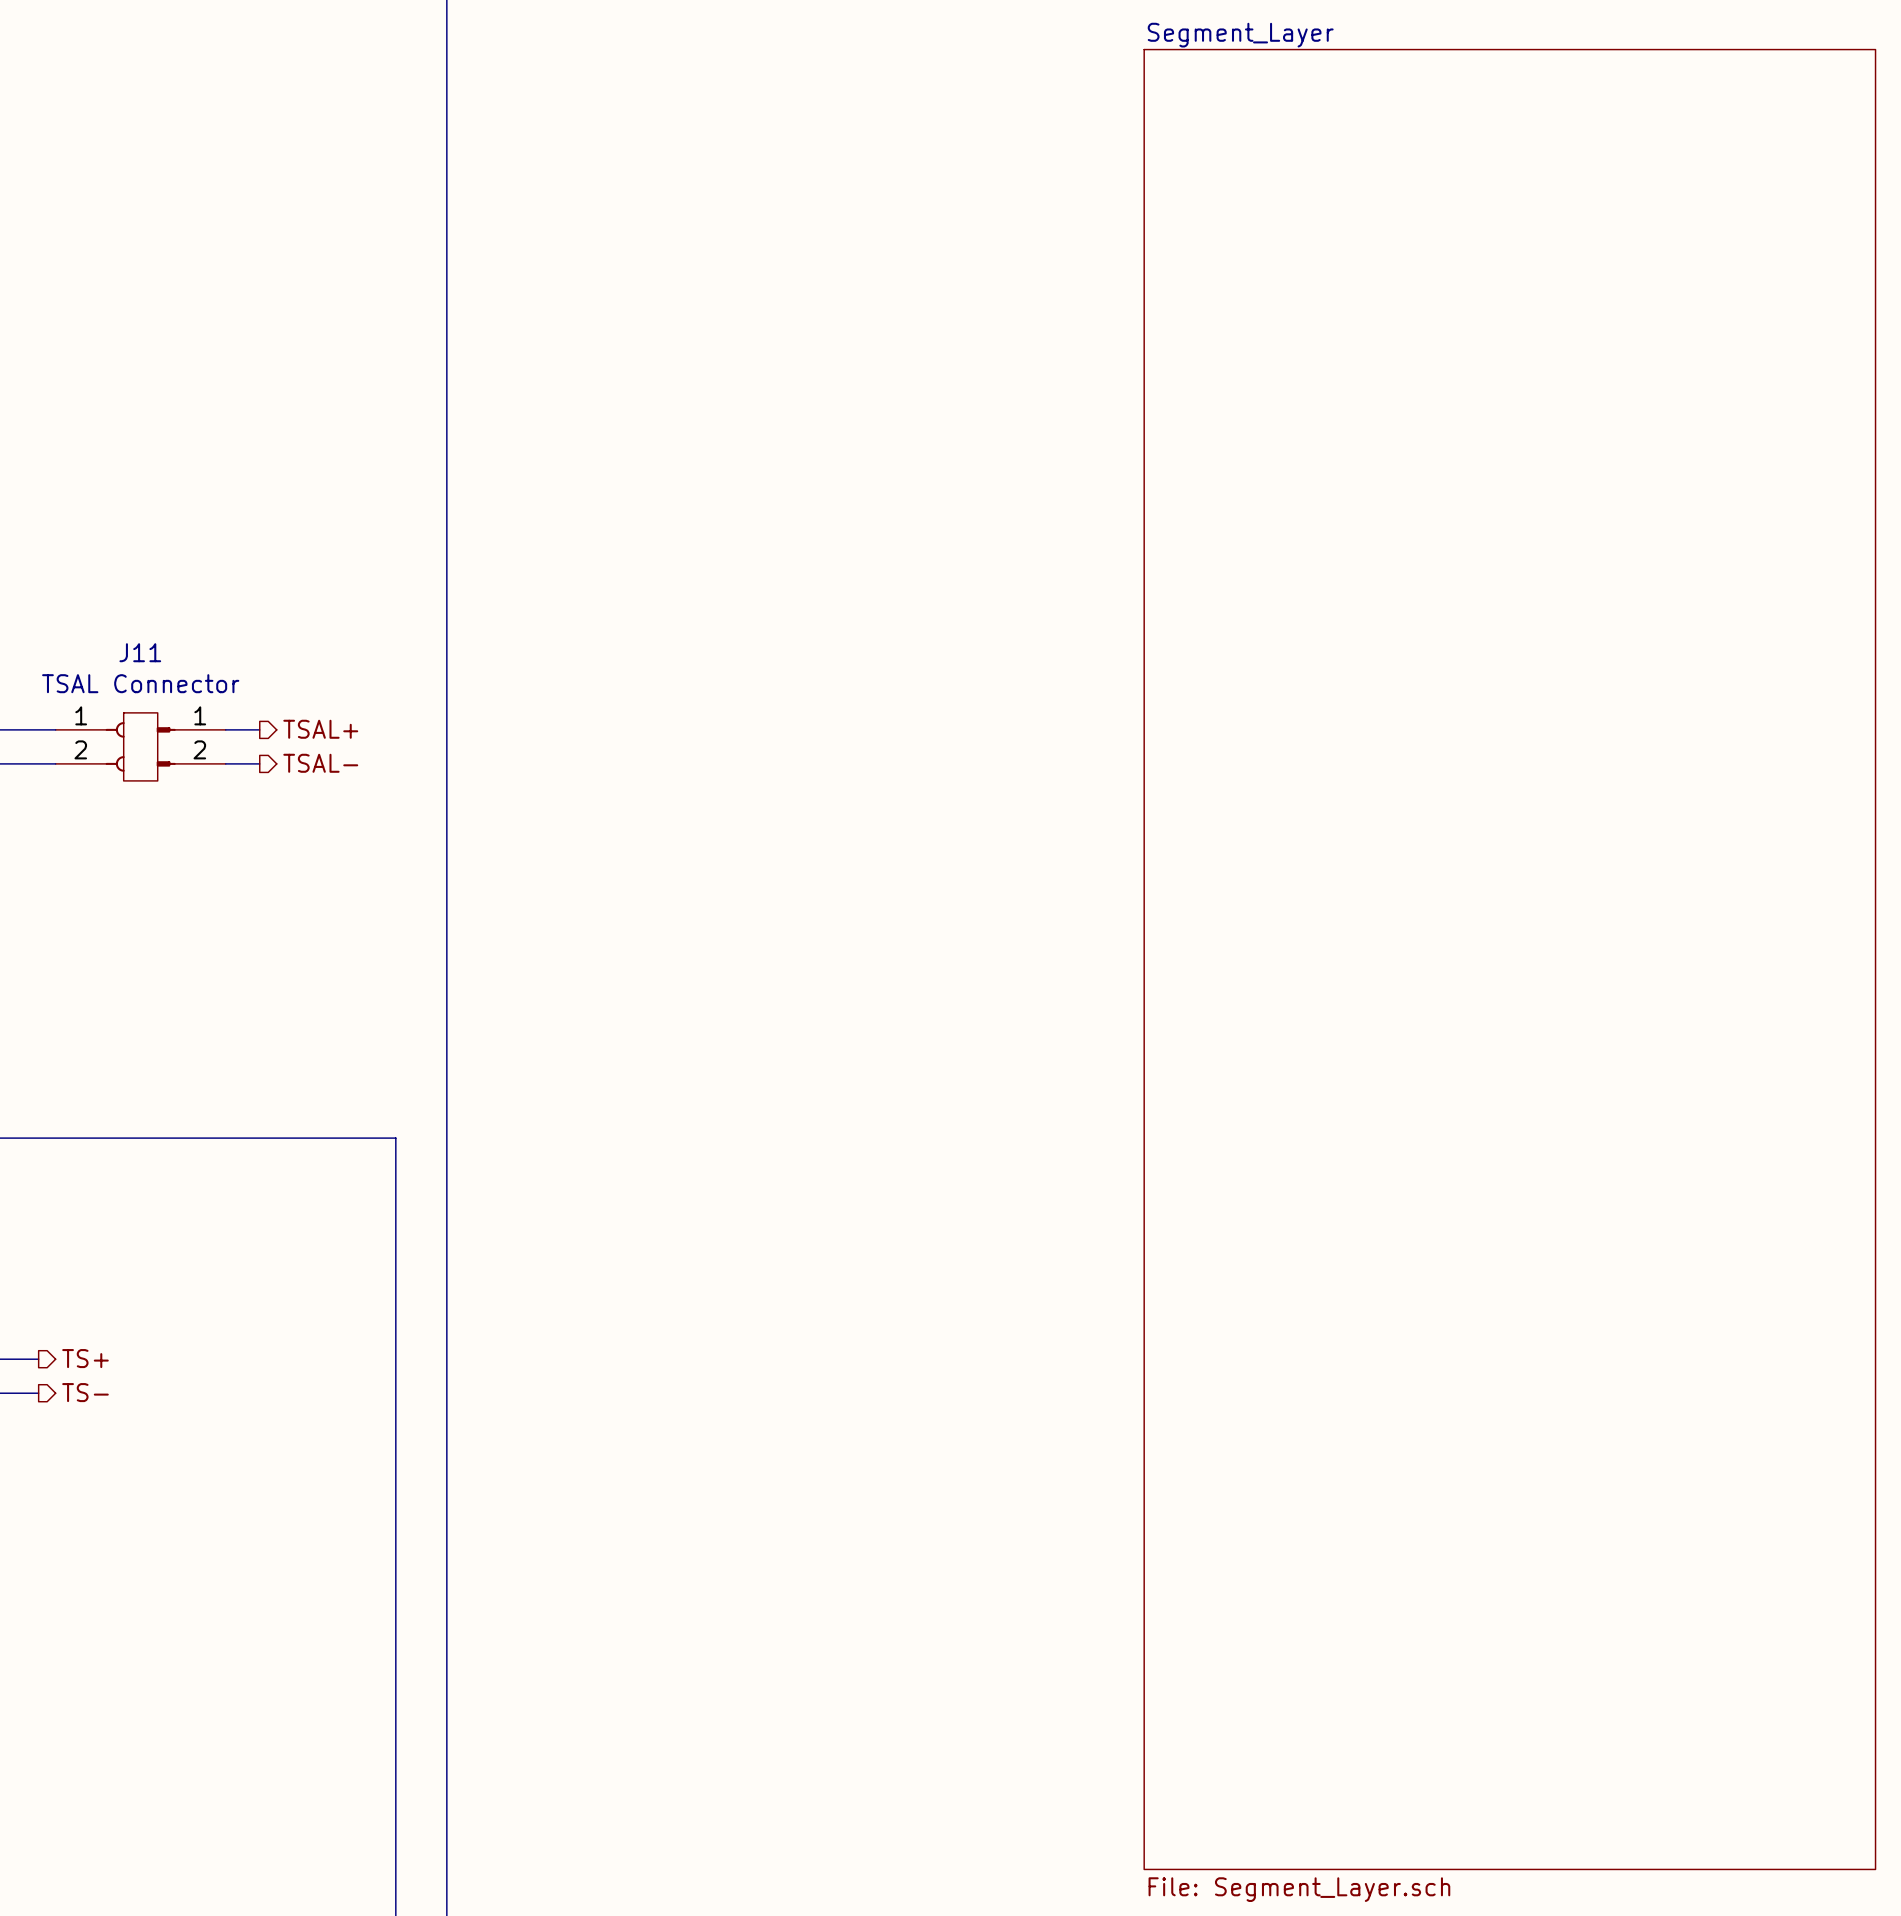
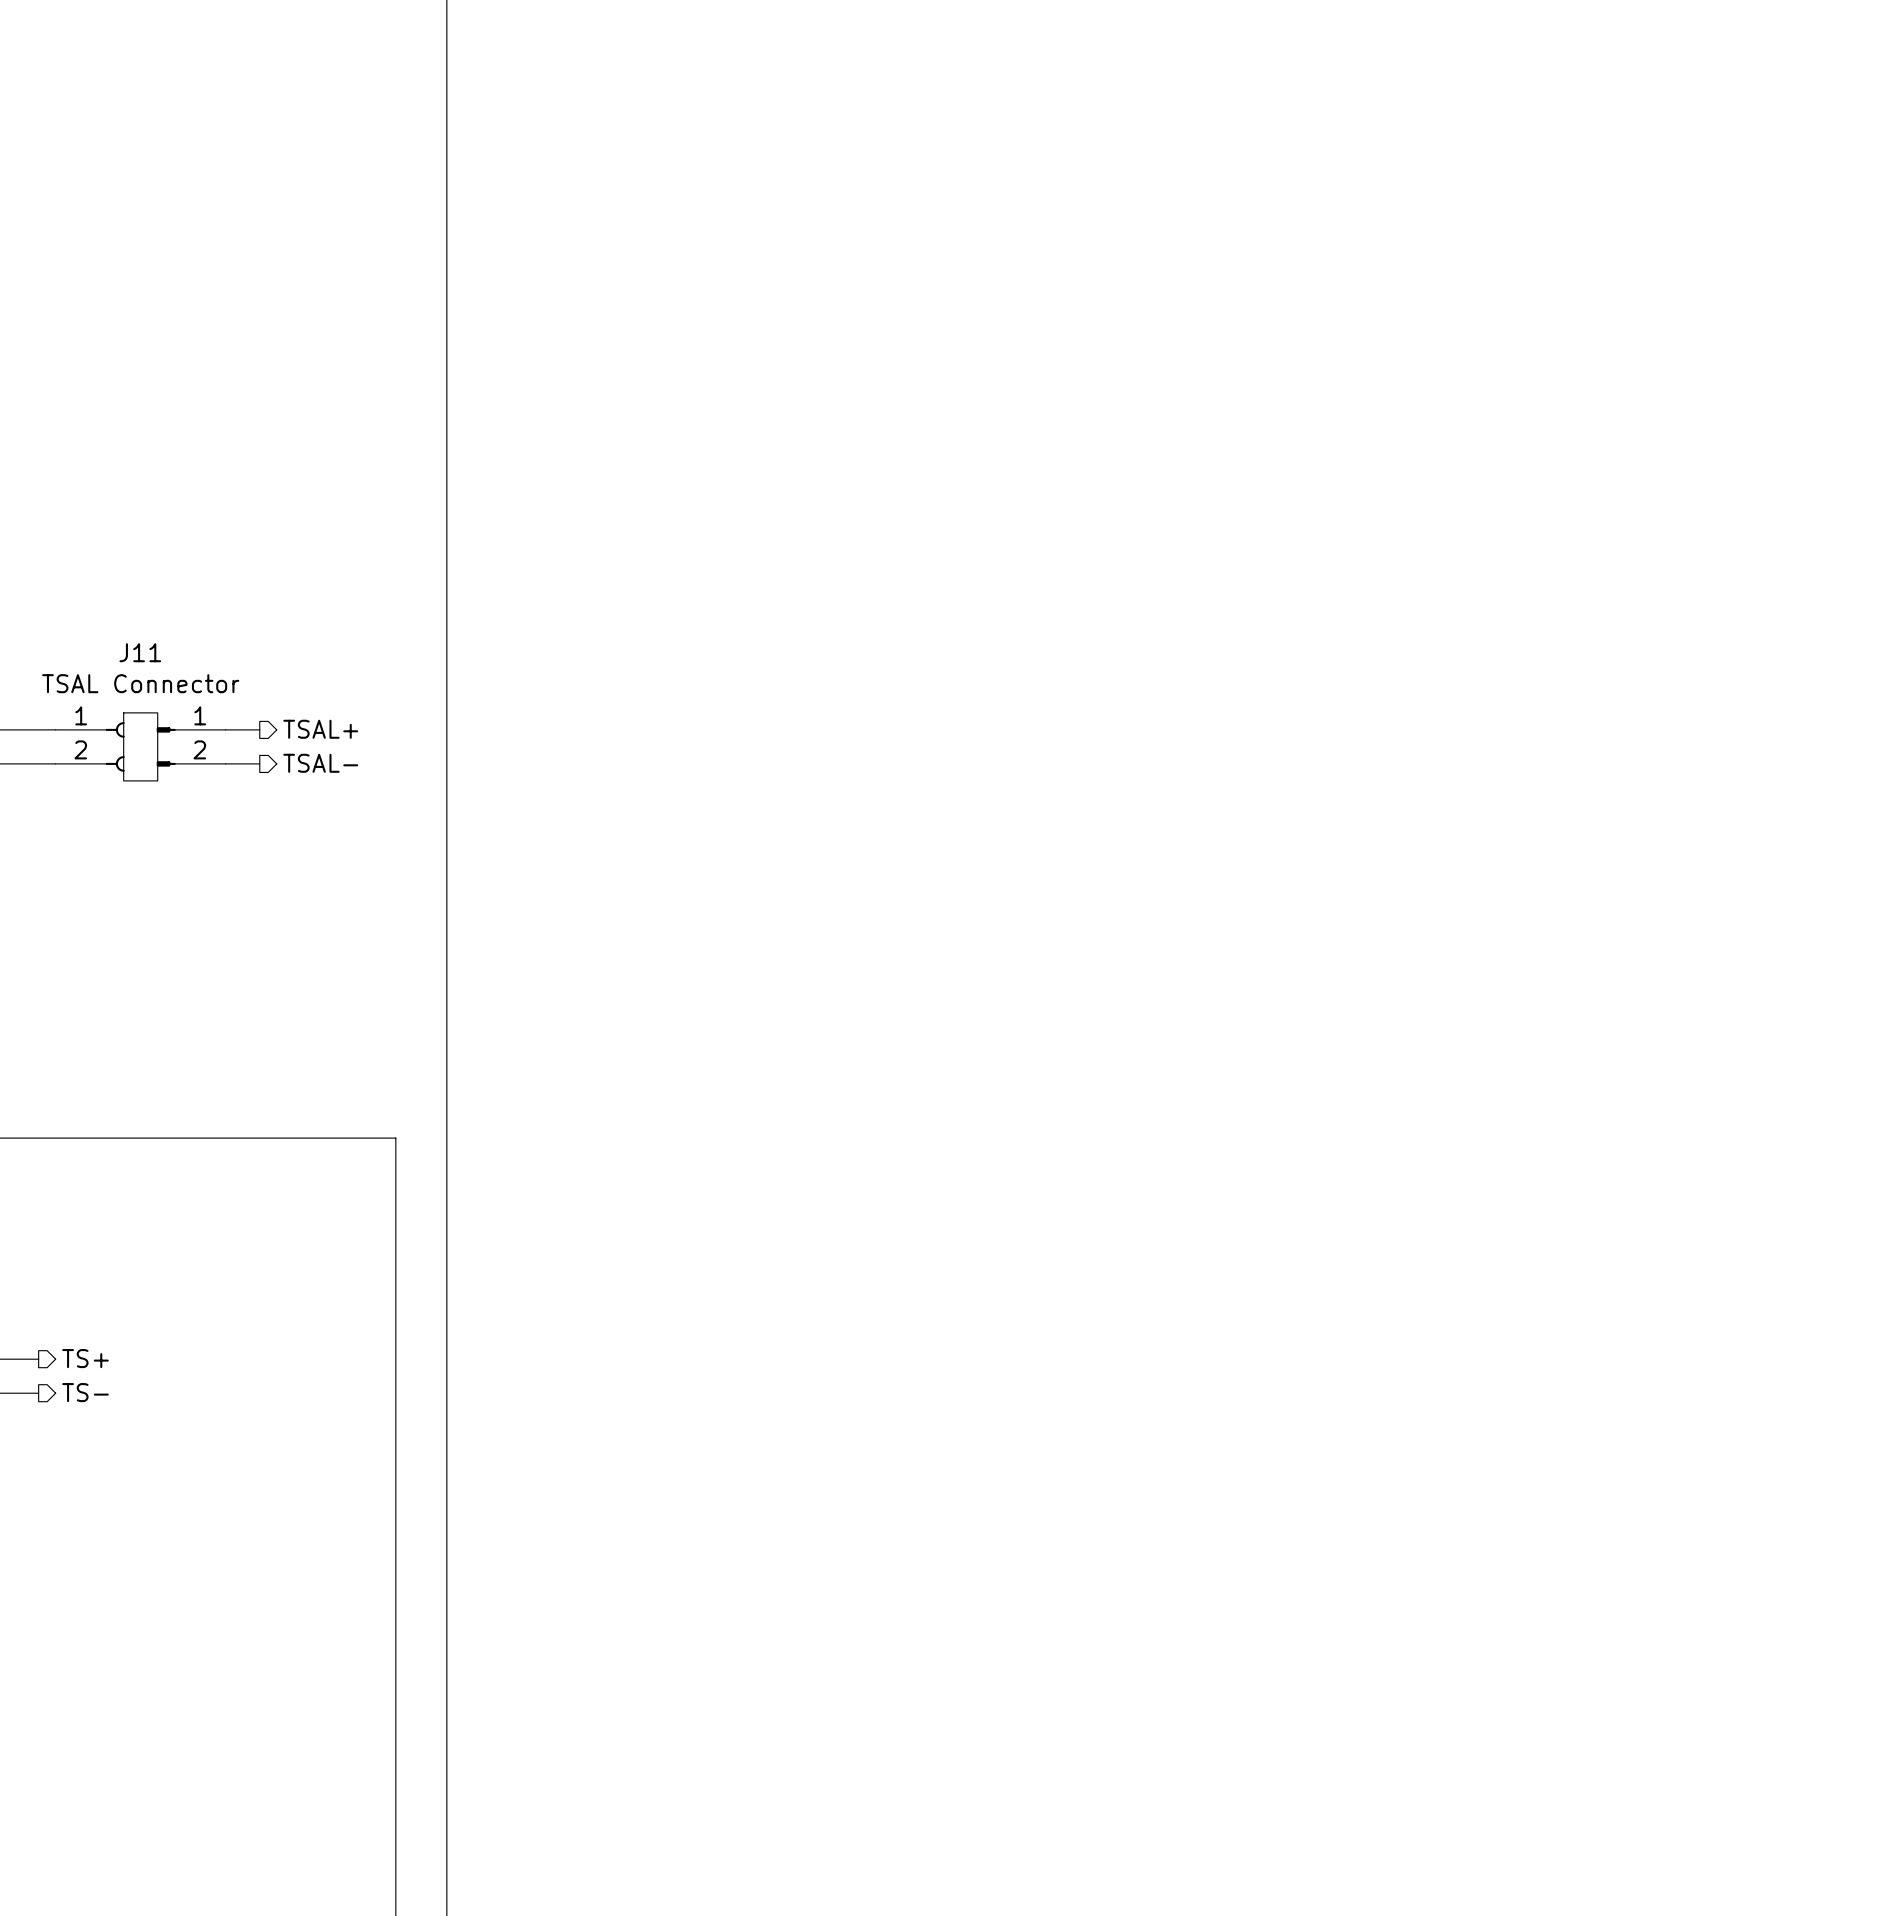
sheet Segment_Layer: File: Segment_Layer.sch (1509, 959) -> none

